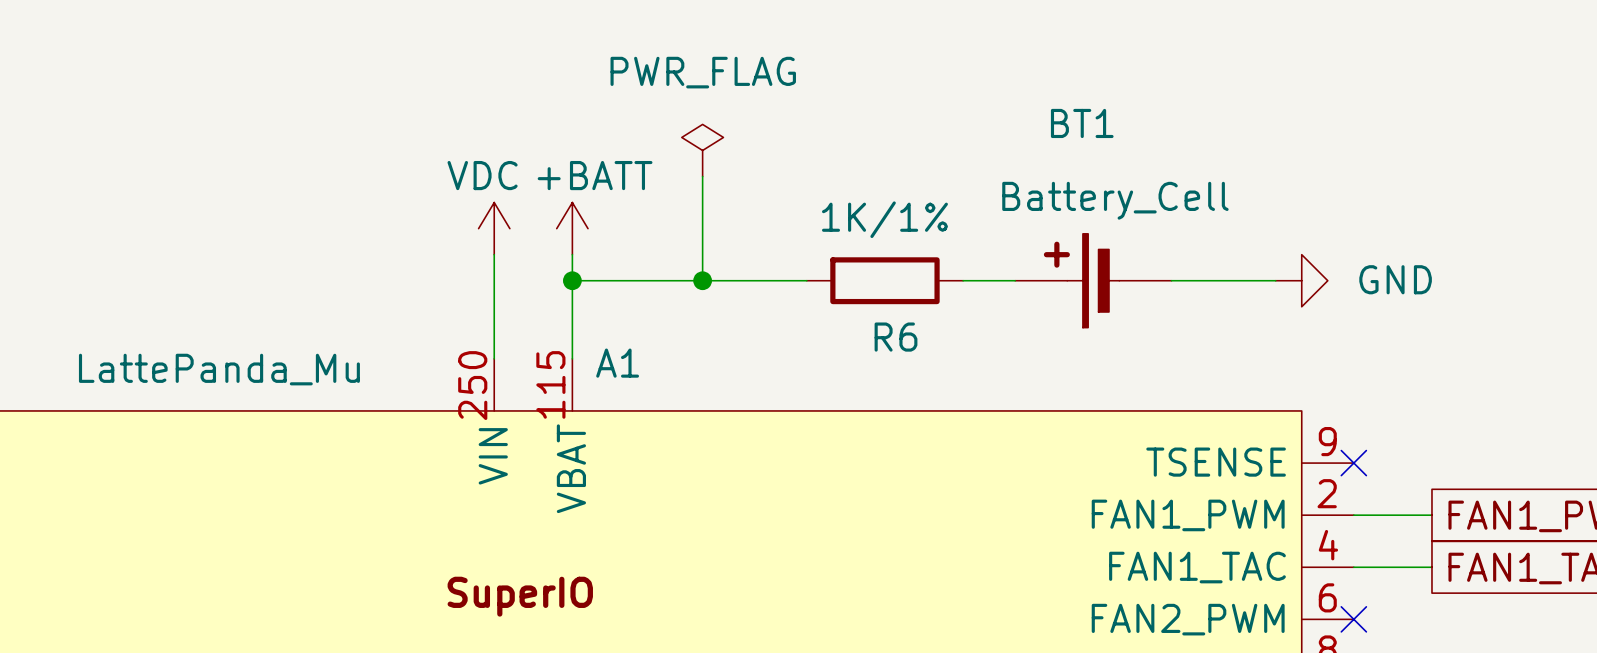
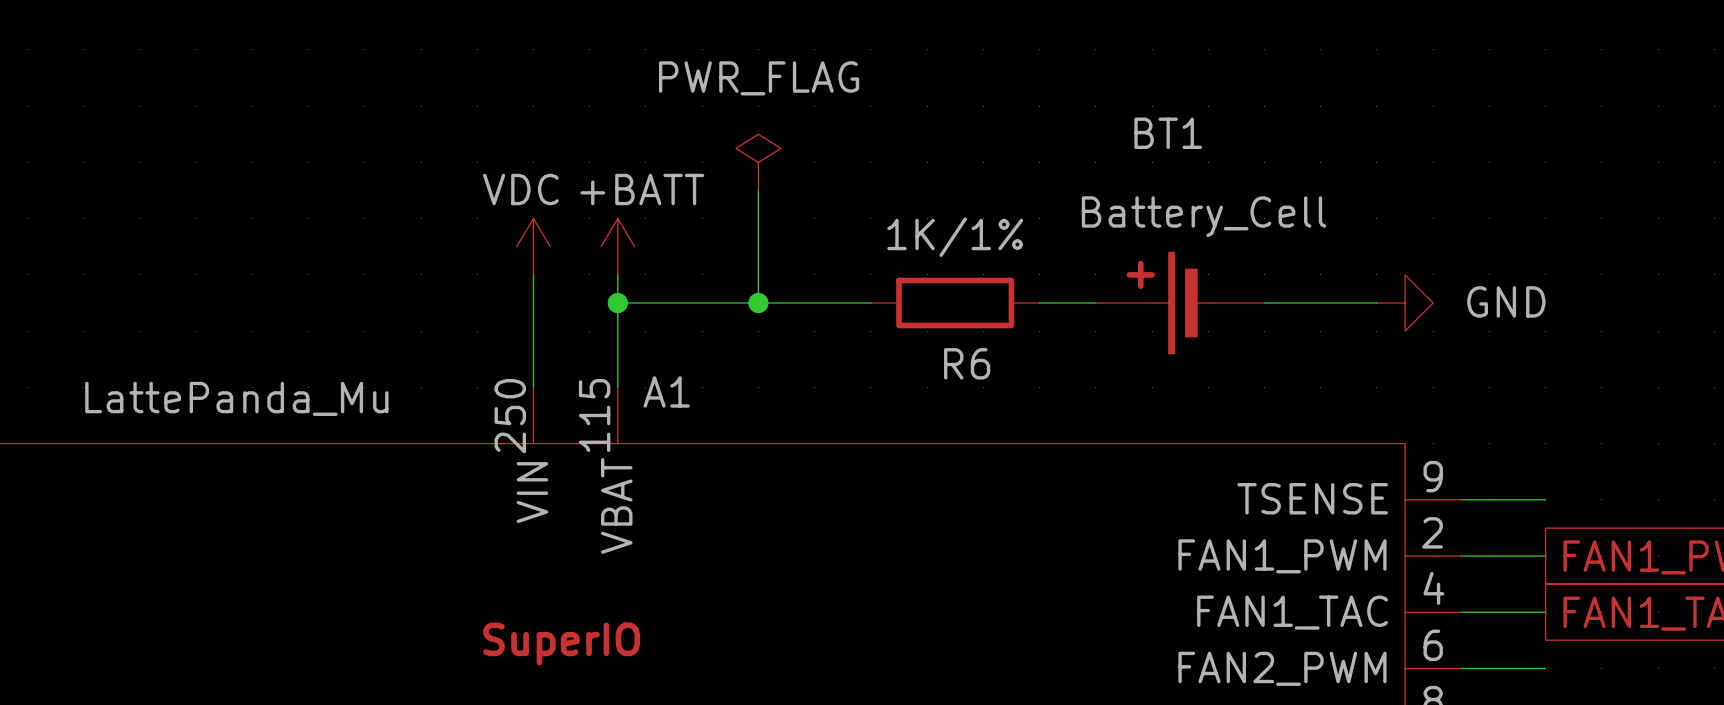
wire: none -> (1461, 499) (1545, 499)
no-connect mark: (1353, 463) -> none
wire: none -> (1461, 668) (1545, 668)
no-connect mark: (1353, 619) -> none

